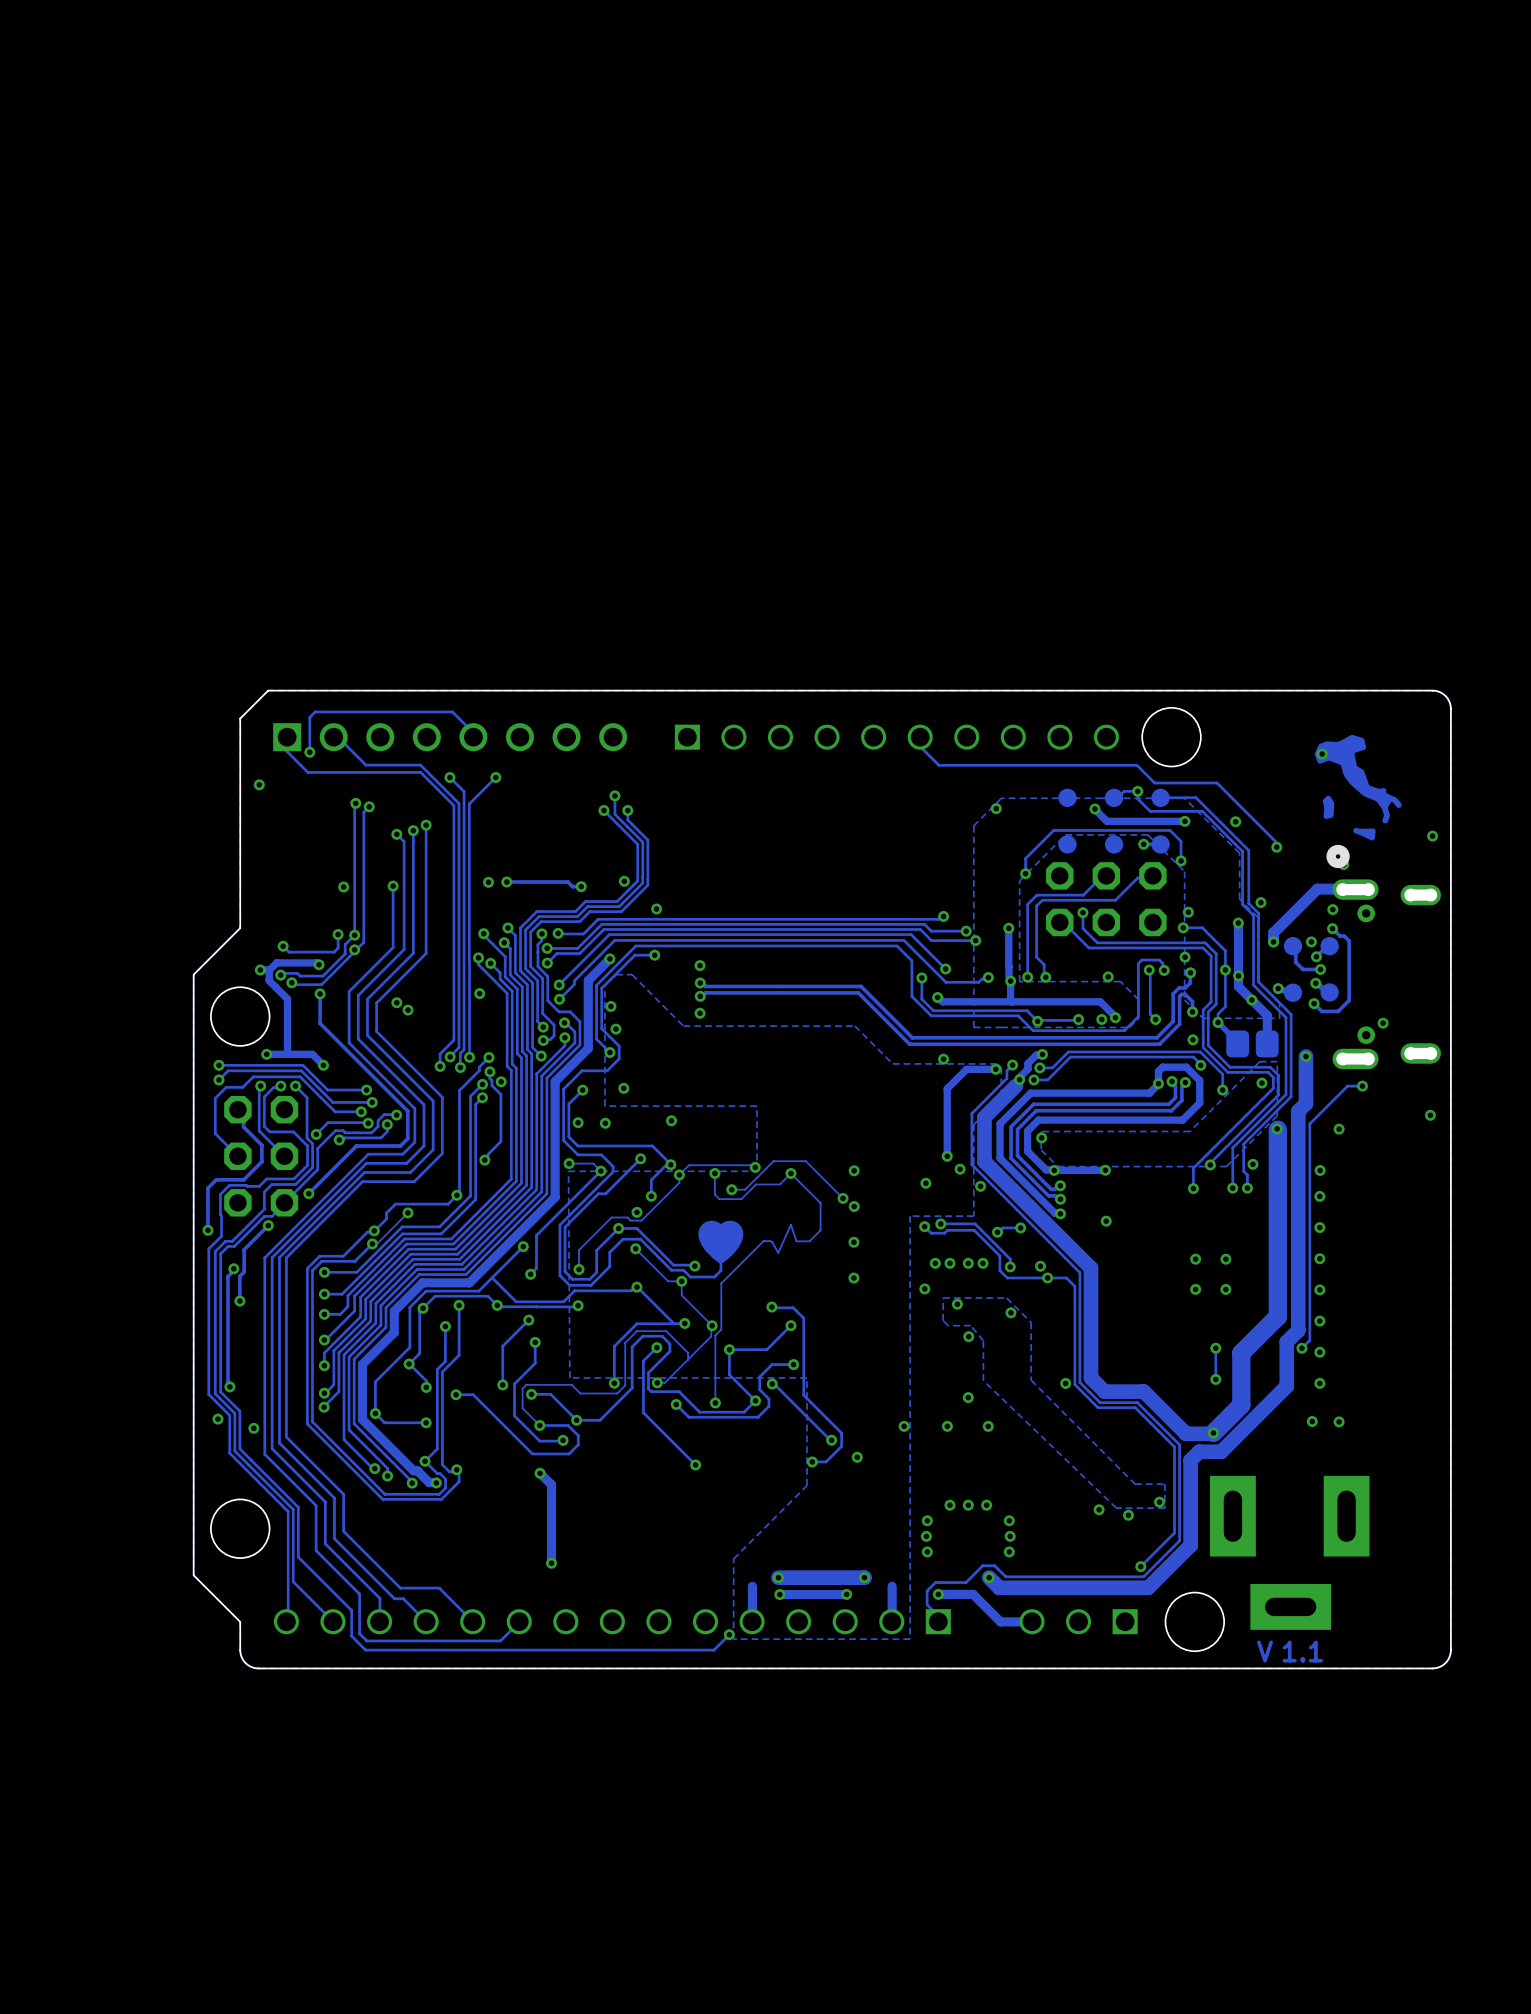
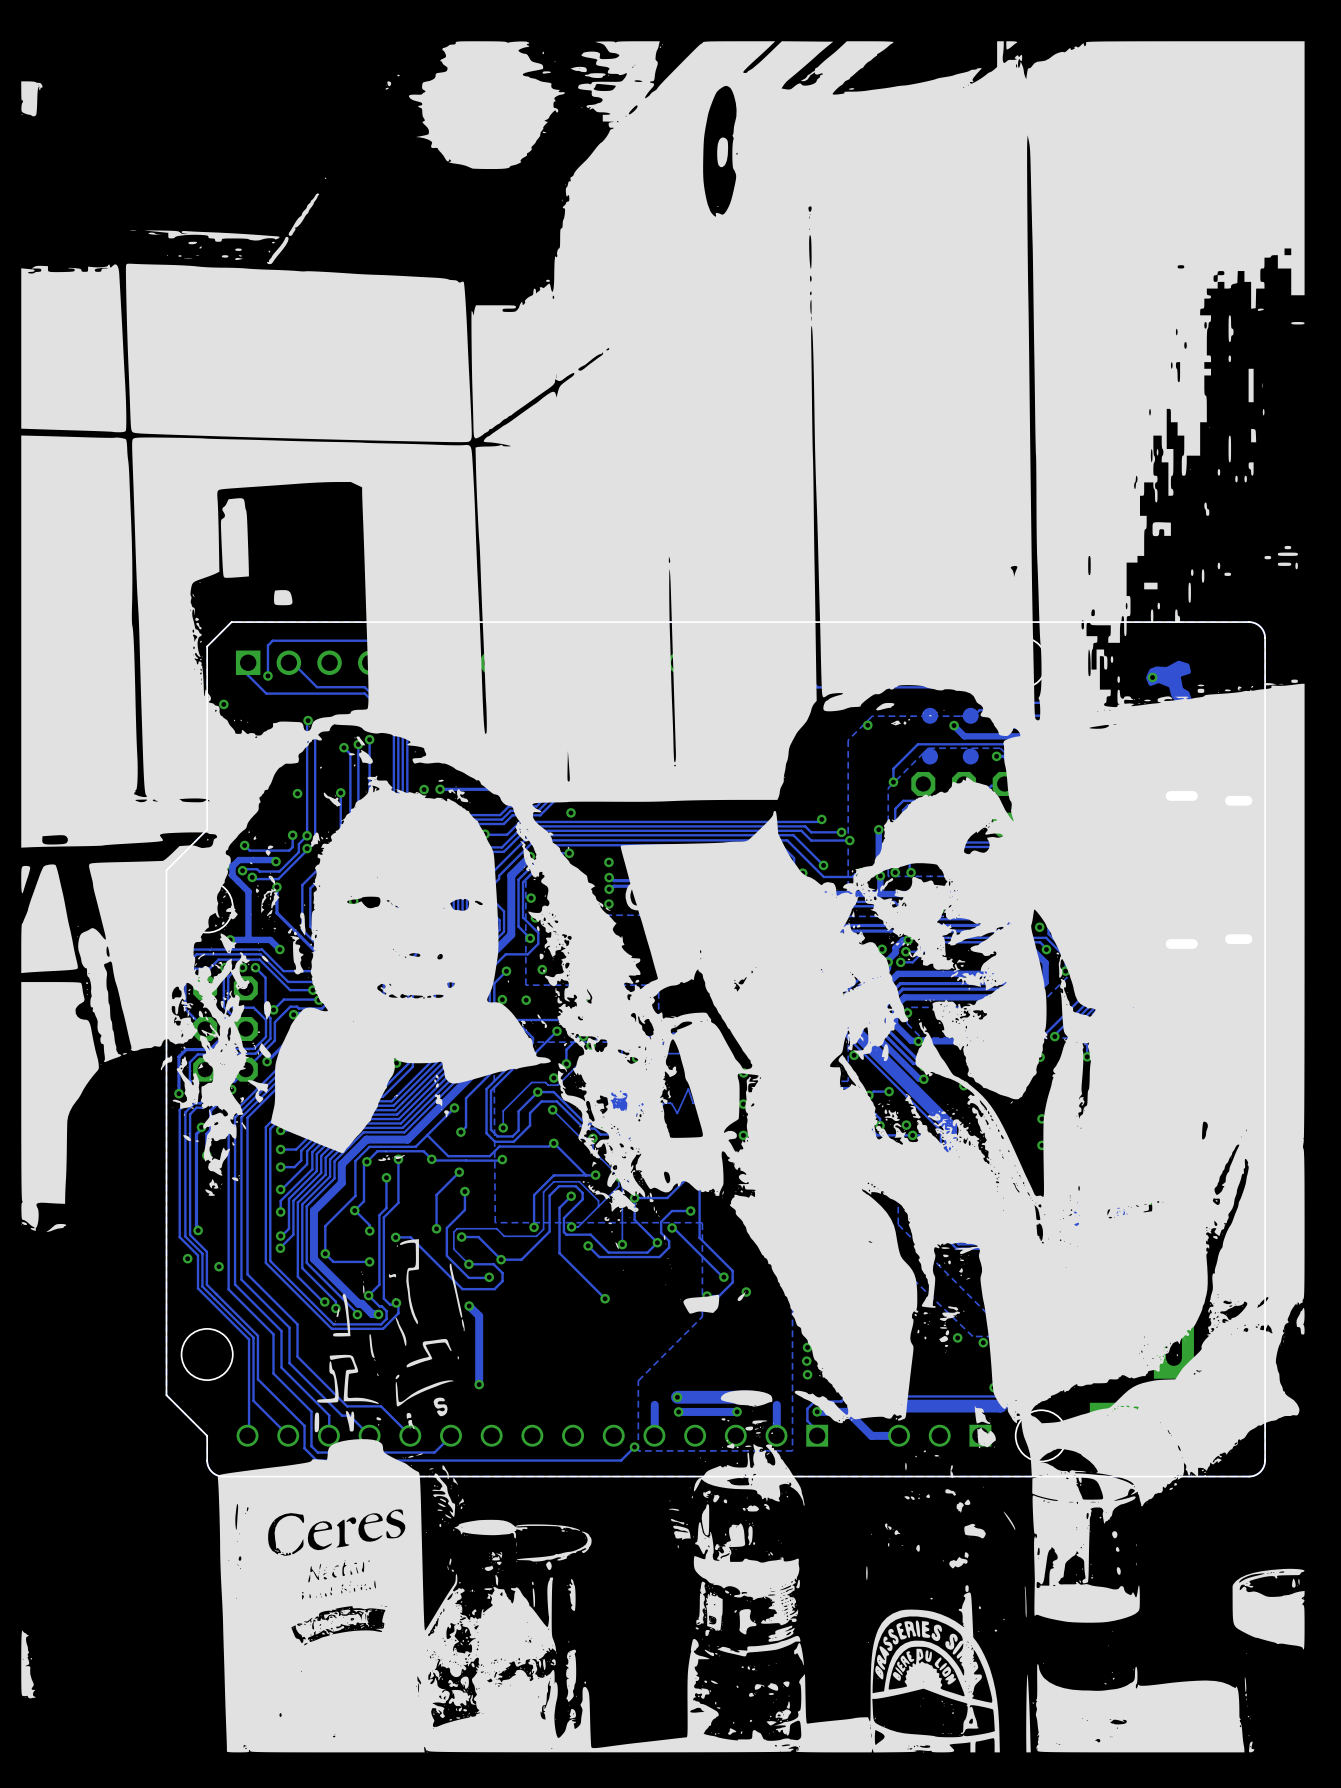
part: none -> (662, 896)

